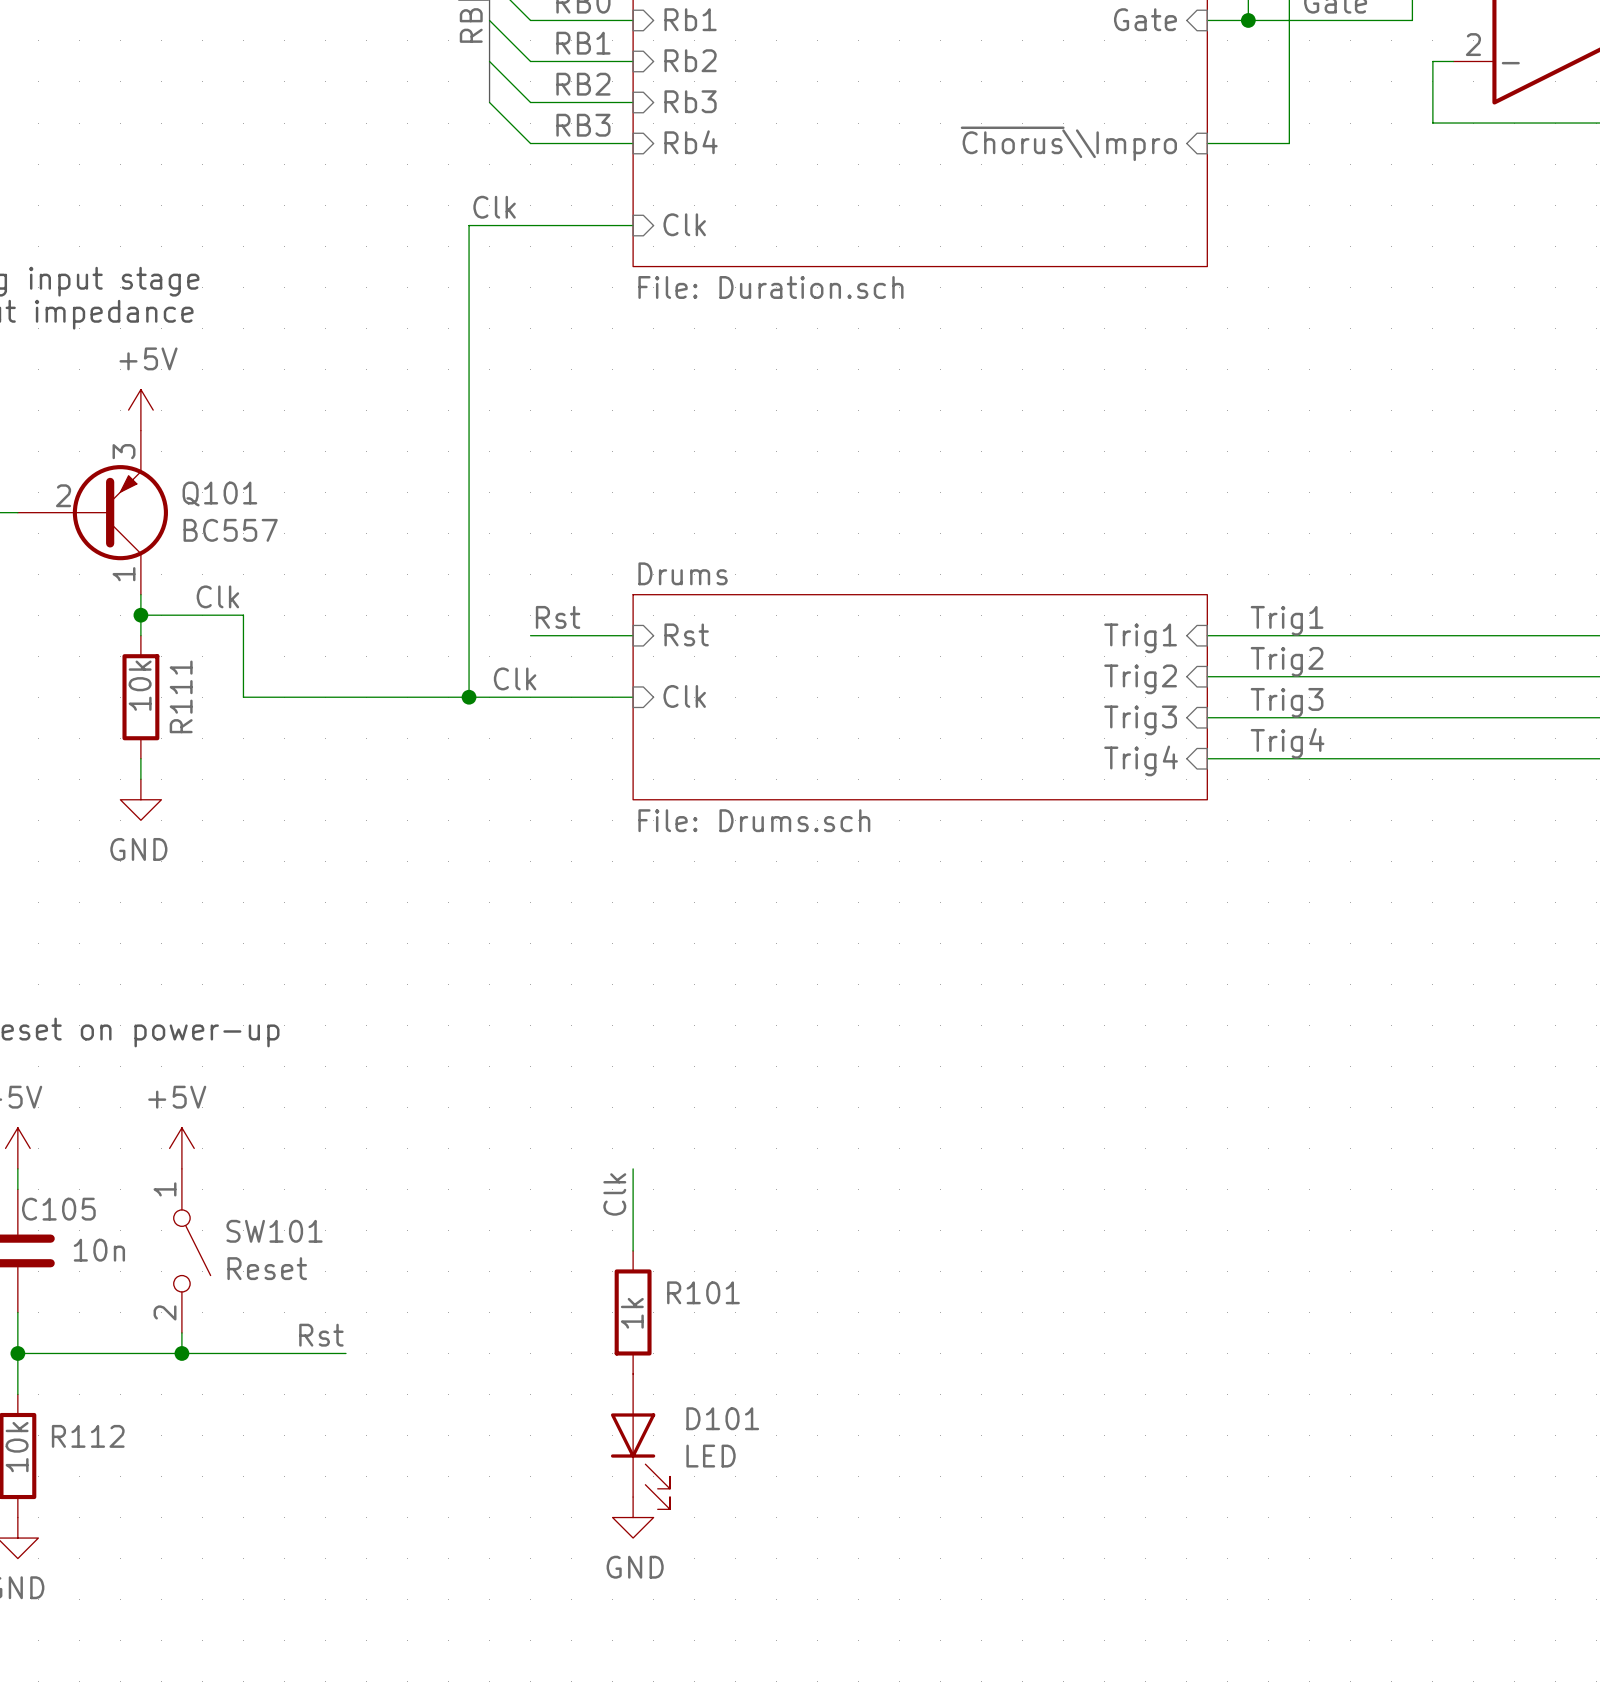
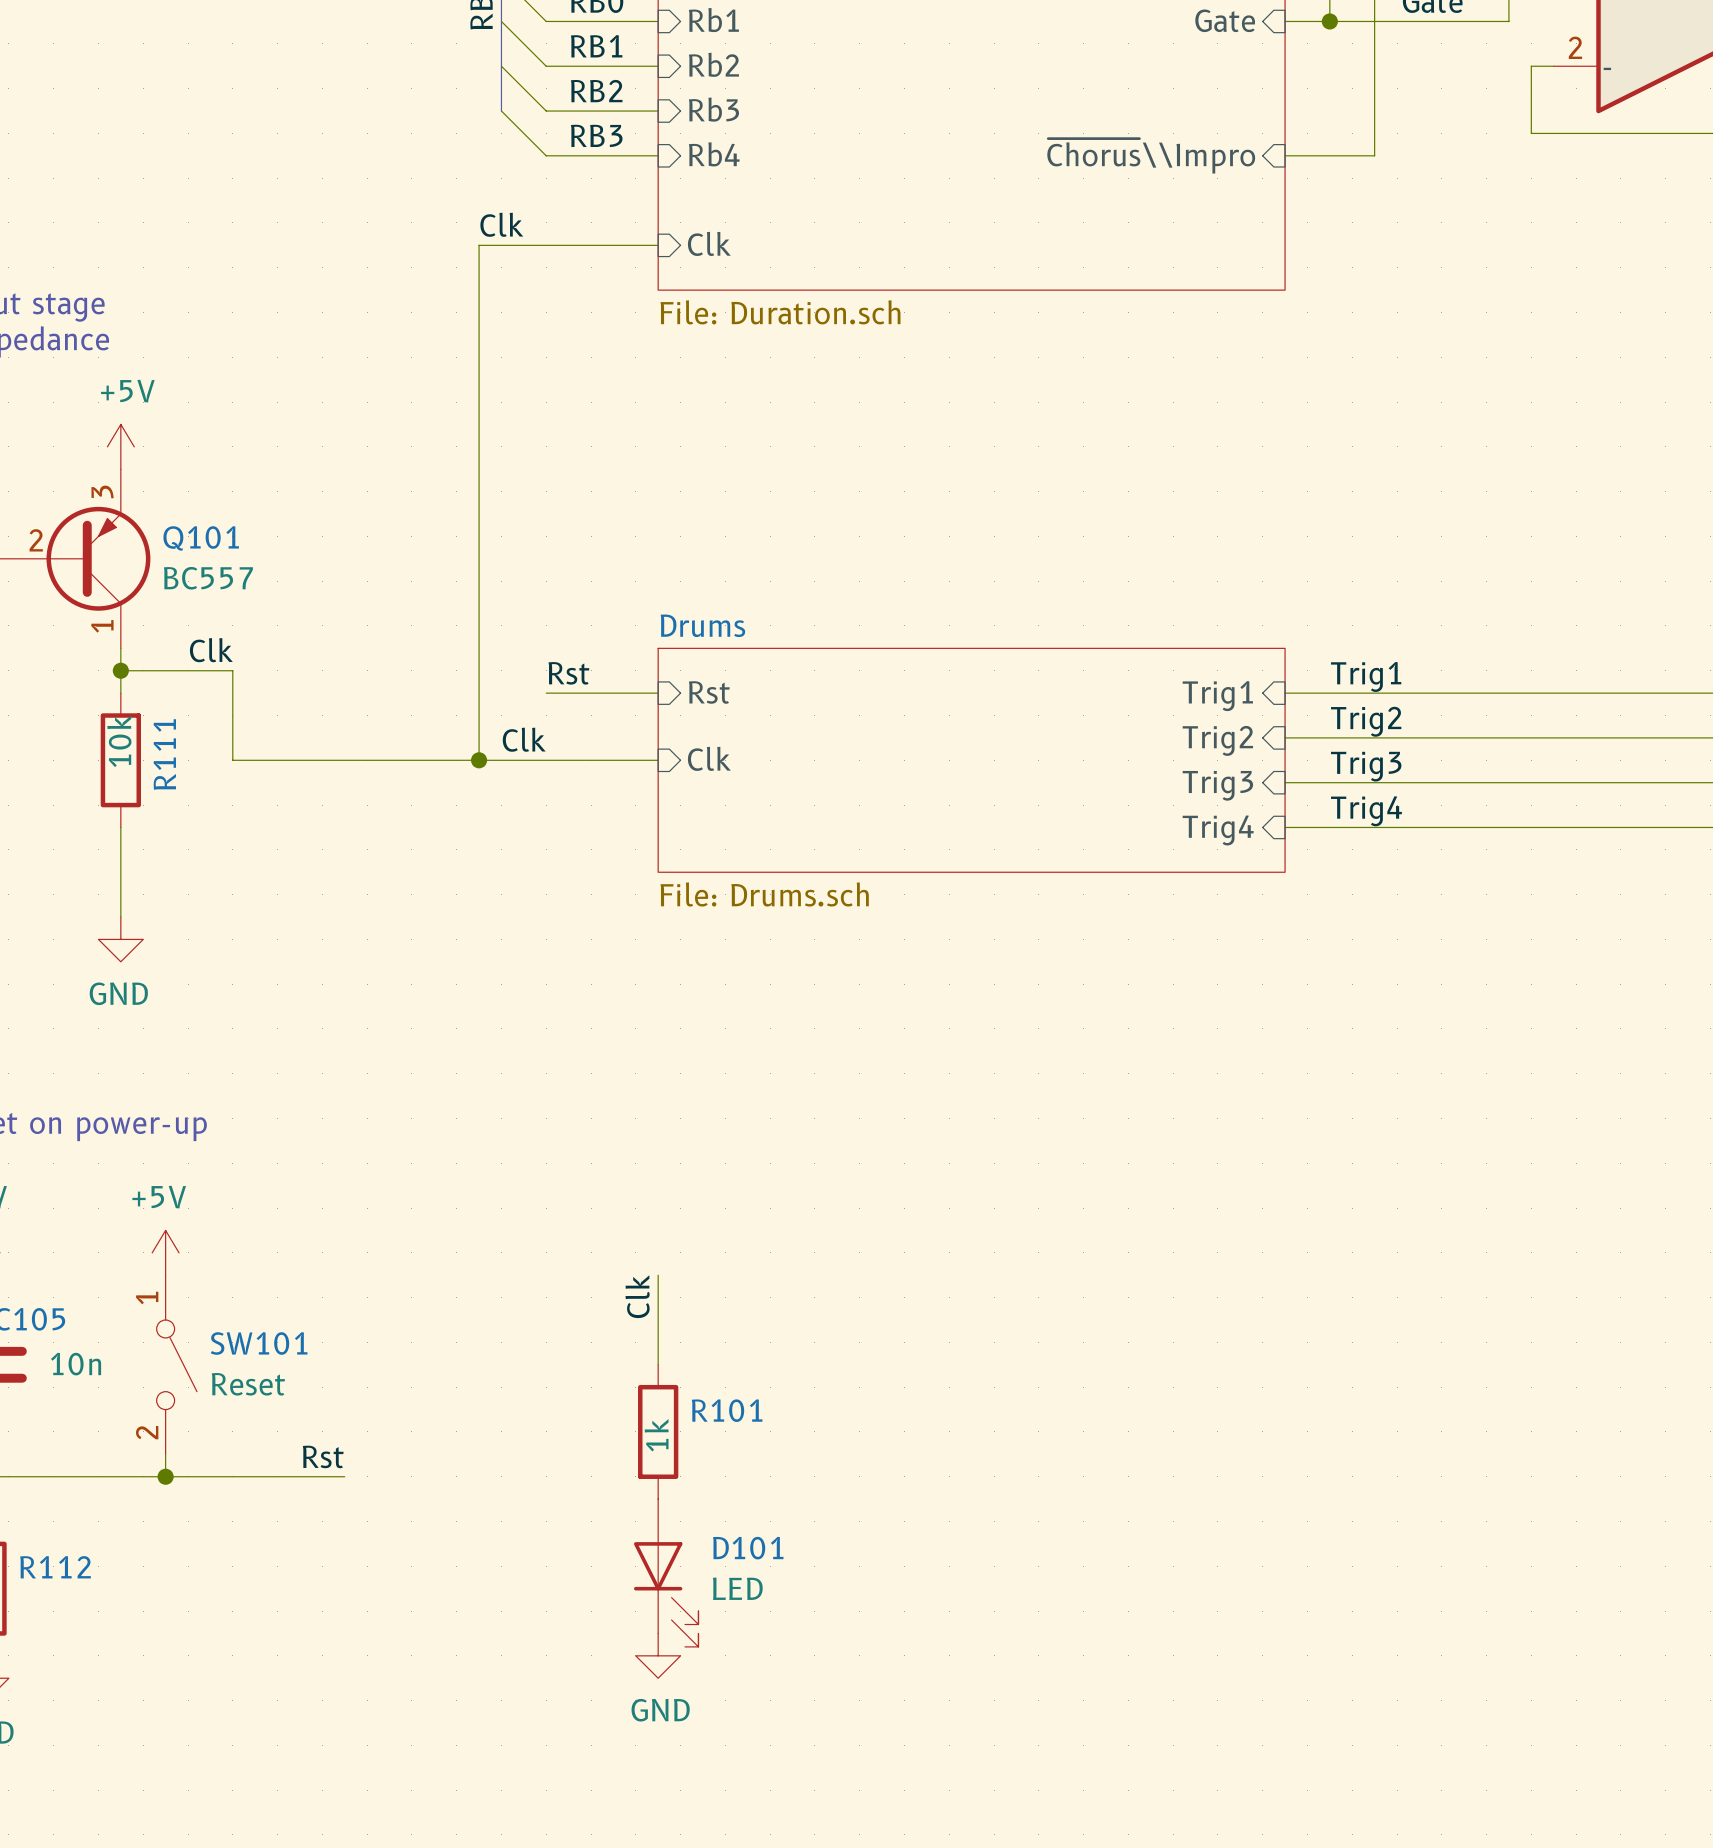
wire: none -> (120, 849) (120, 917)
power symbol position: GND (140, 799) -> GND (120, 939)

